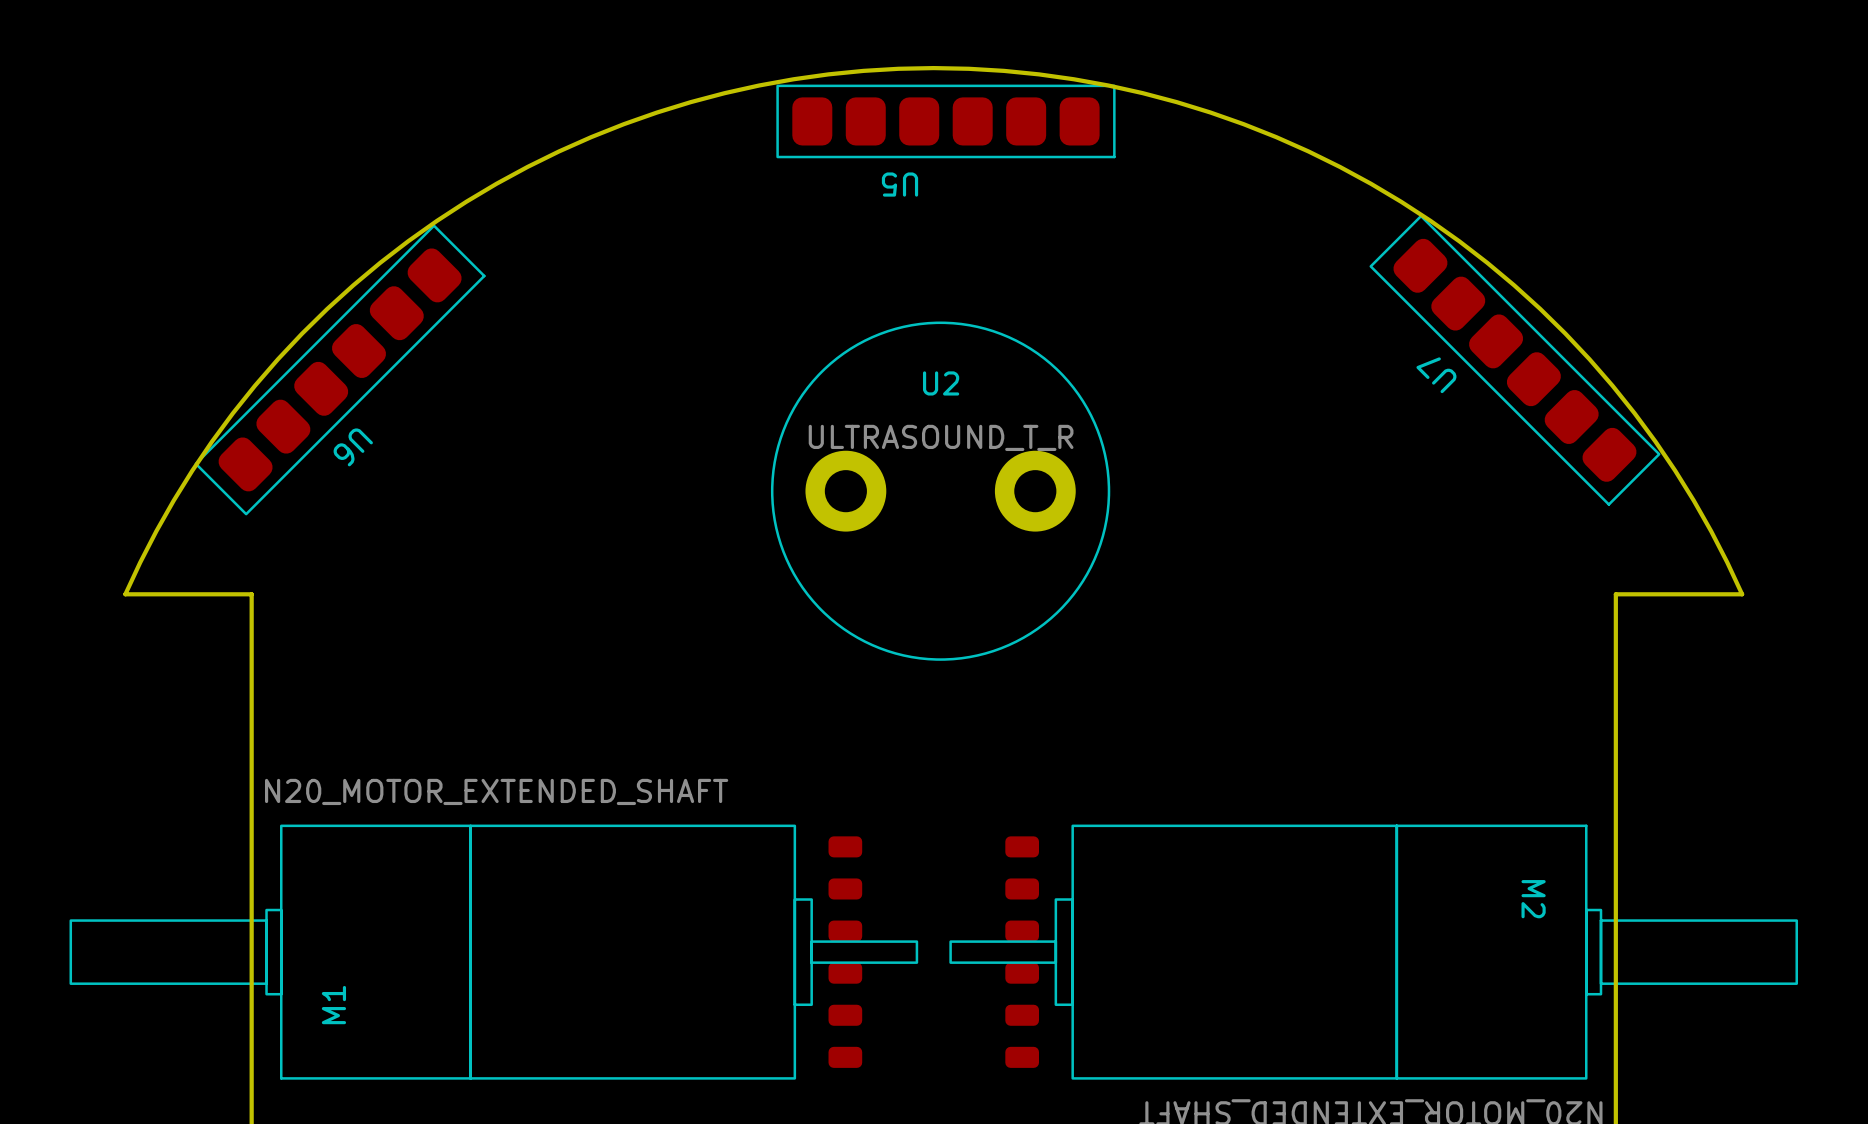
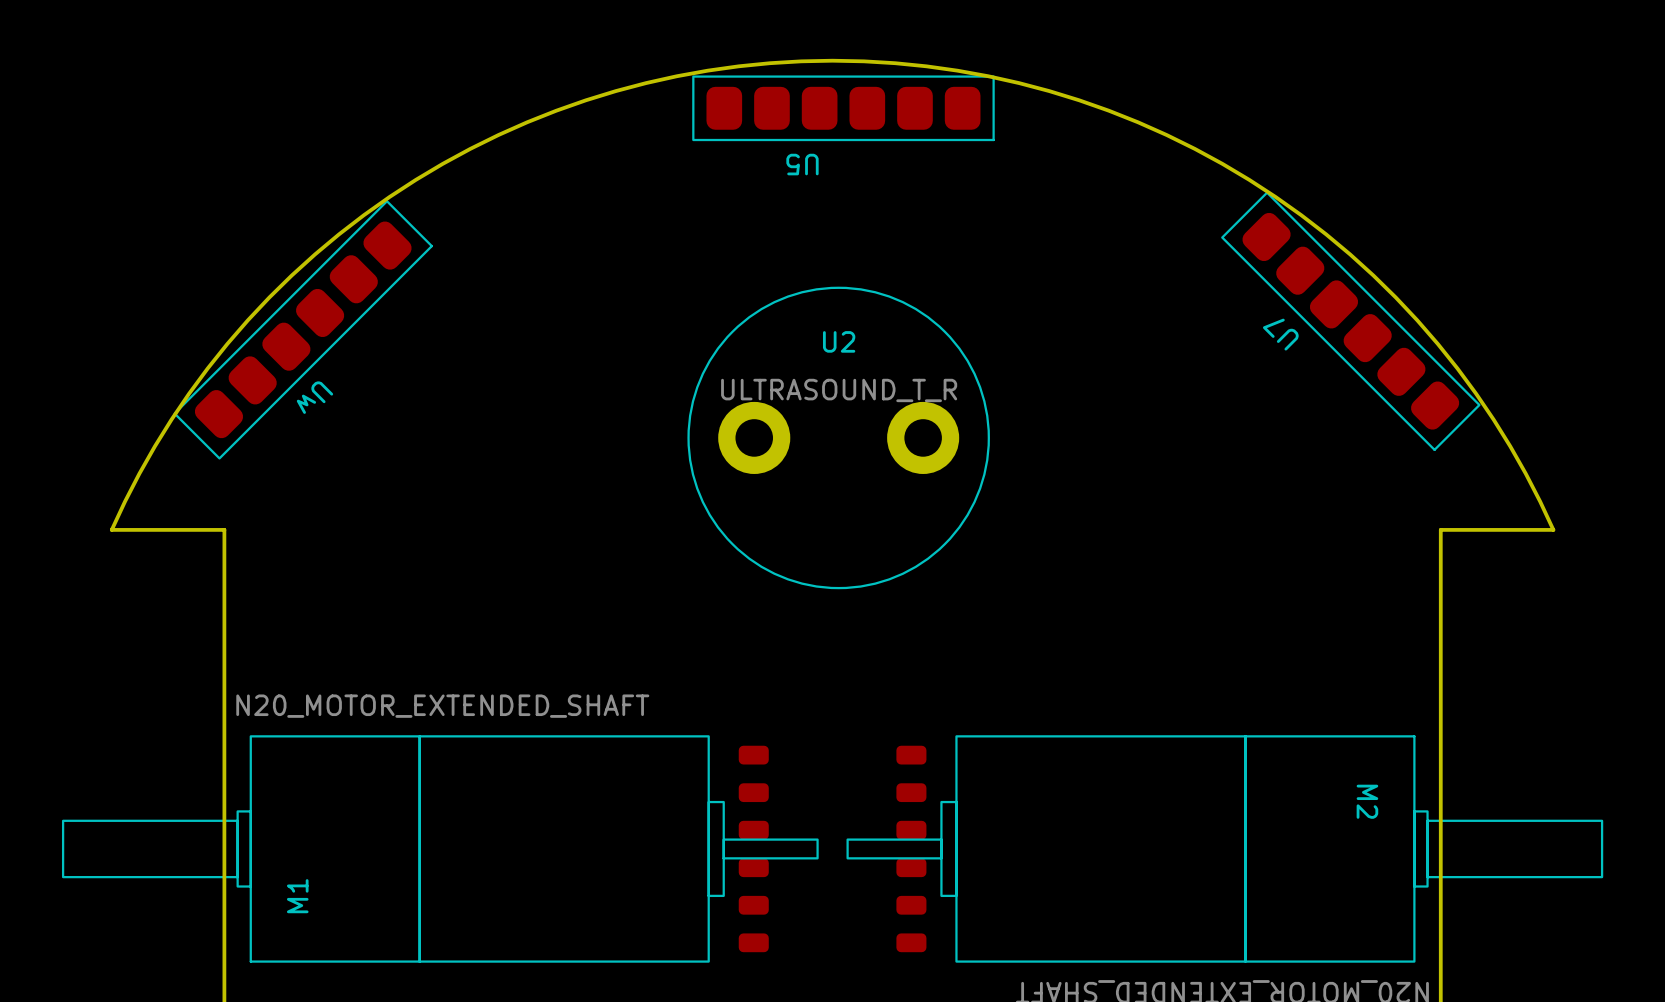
U6 name: U6 (353, 447) -> Uw (314, 397)

